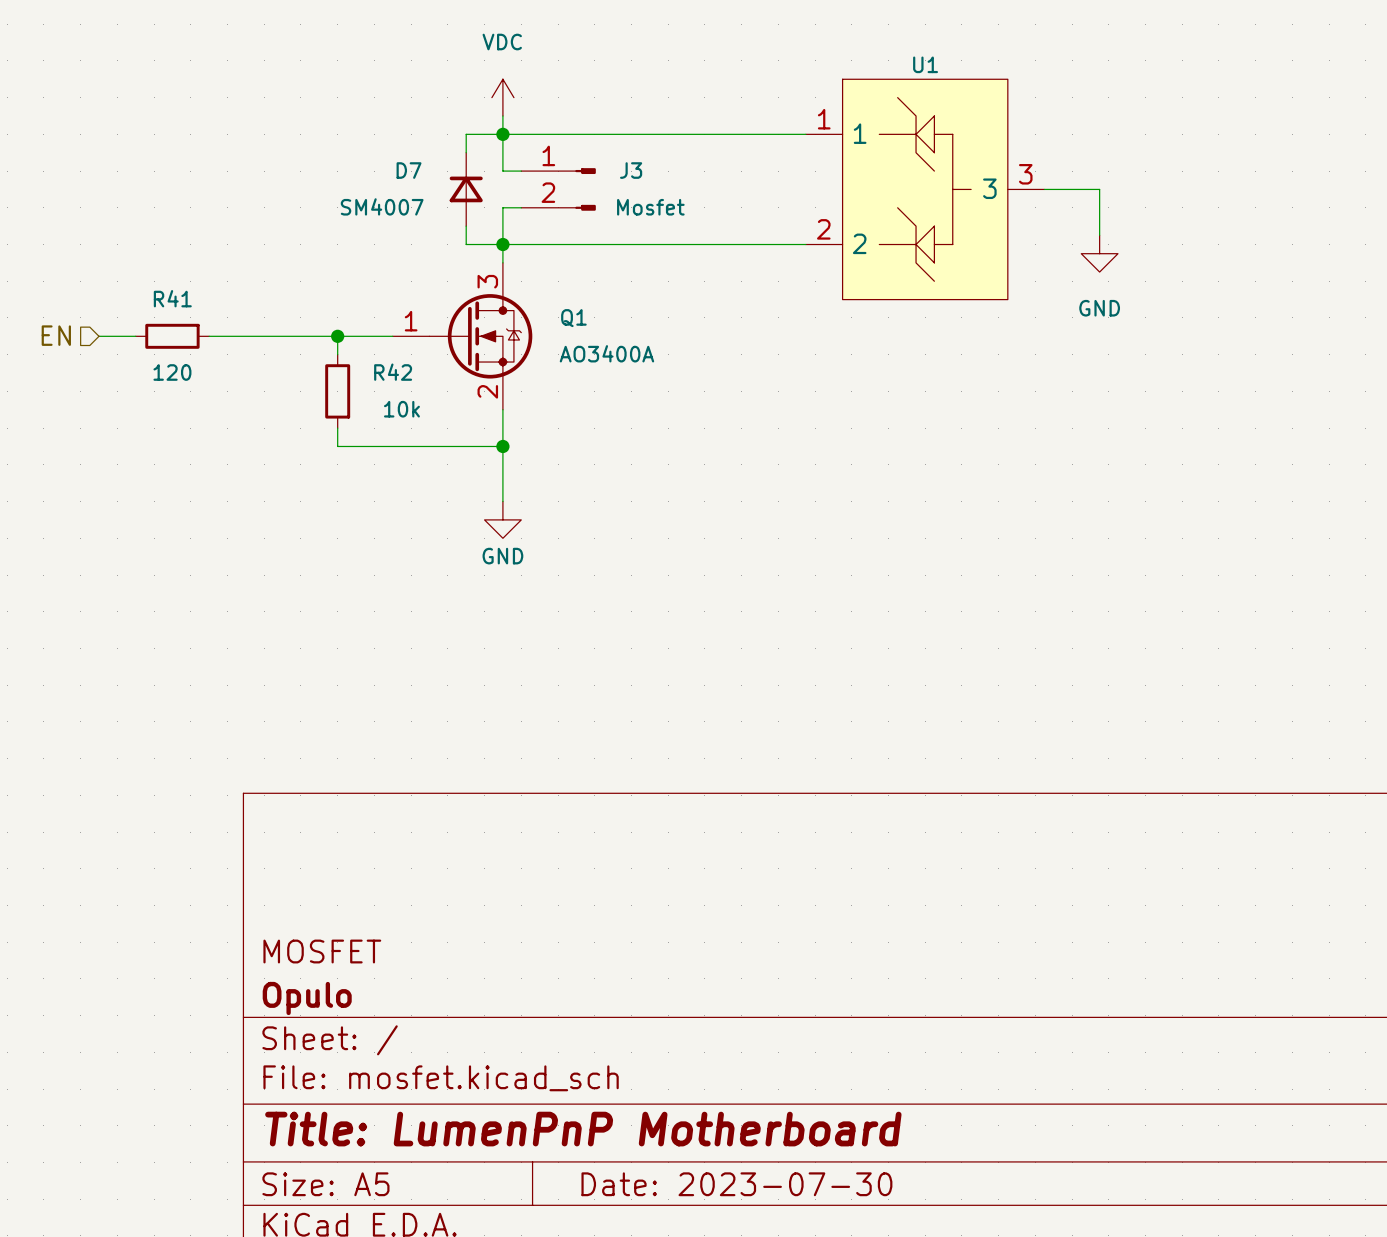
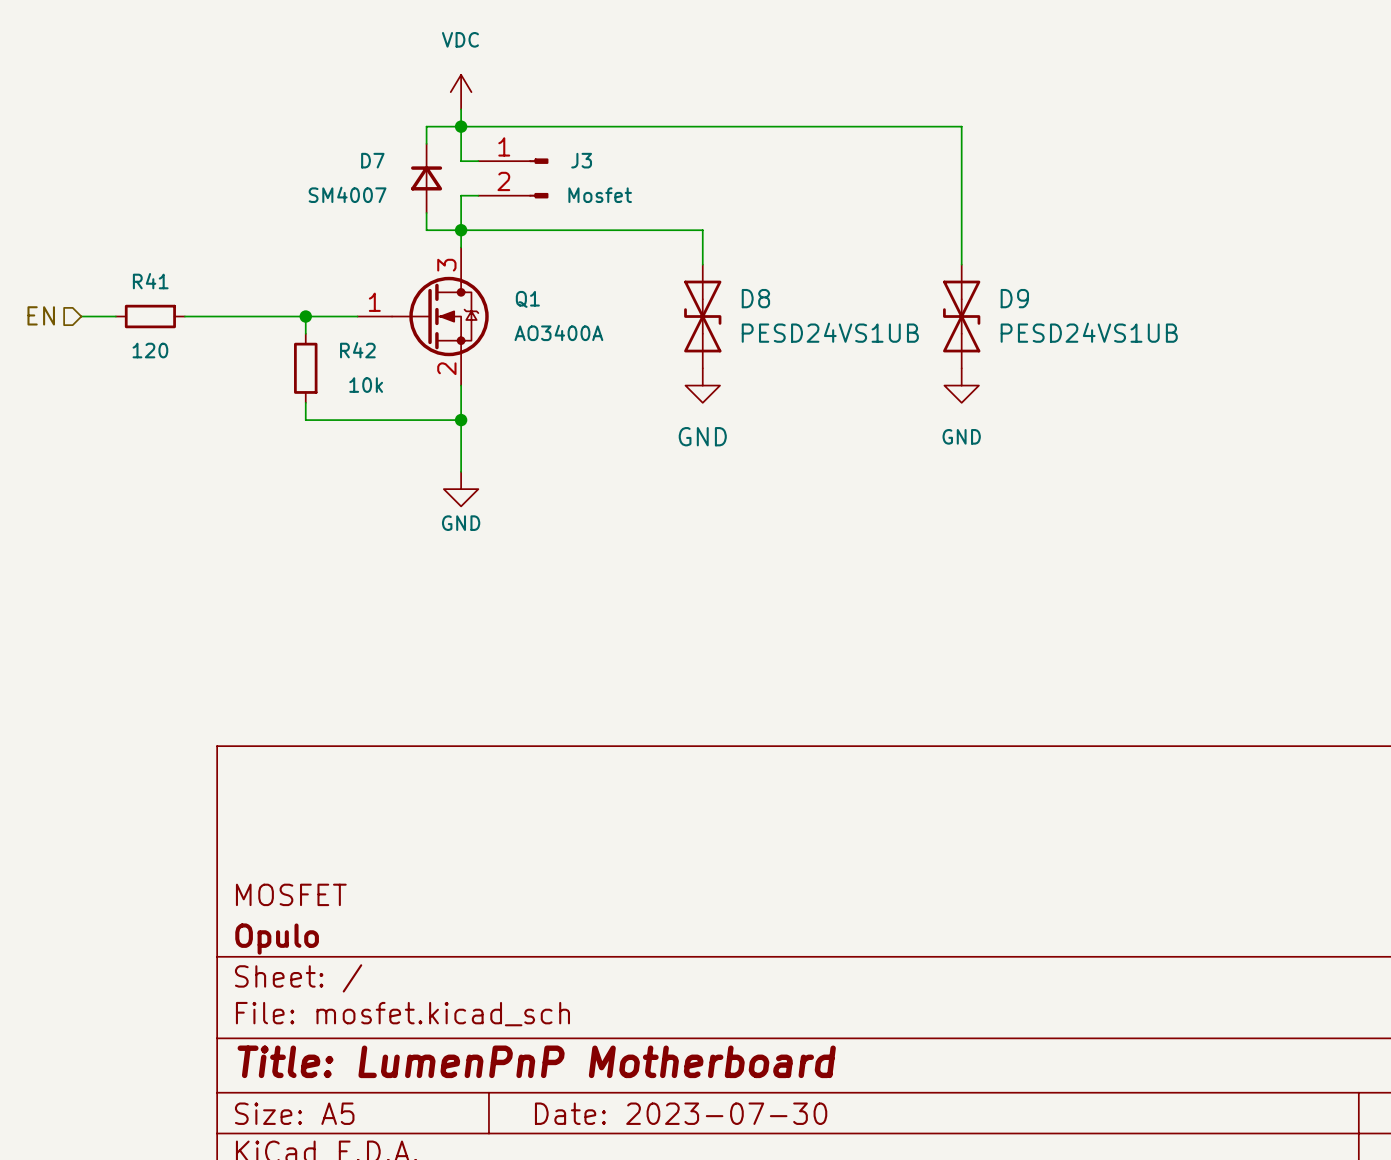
wire: none -> (745, 126) (961, 126) (961, 264)
U1: (925, 189) -> none
wire: (1044, 189) (1099, 189) (1099, 235) -> none
wire: (759, 244) (805, 244) -> (702, 230) (702, 264)
power symbol position: GND (1099, 253) -> GND (961, 385)
D8: none -> PESD24VS1UB (702, 316)
D9: none -> PESD24VS1UB (961, 316)
power symbol: none -> GND (702, 385)

